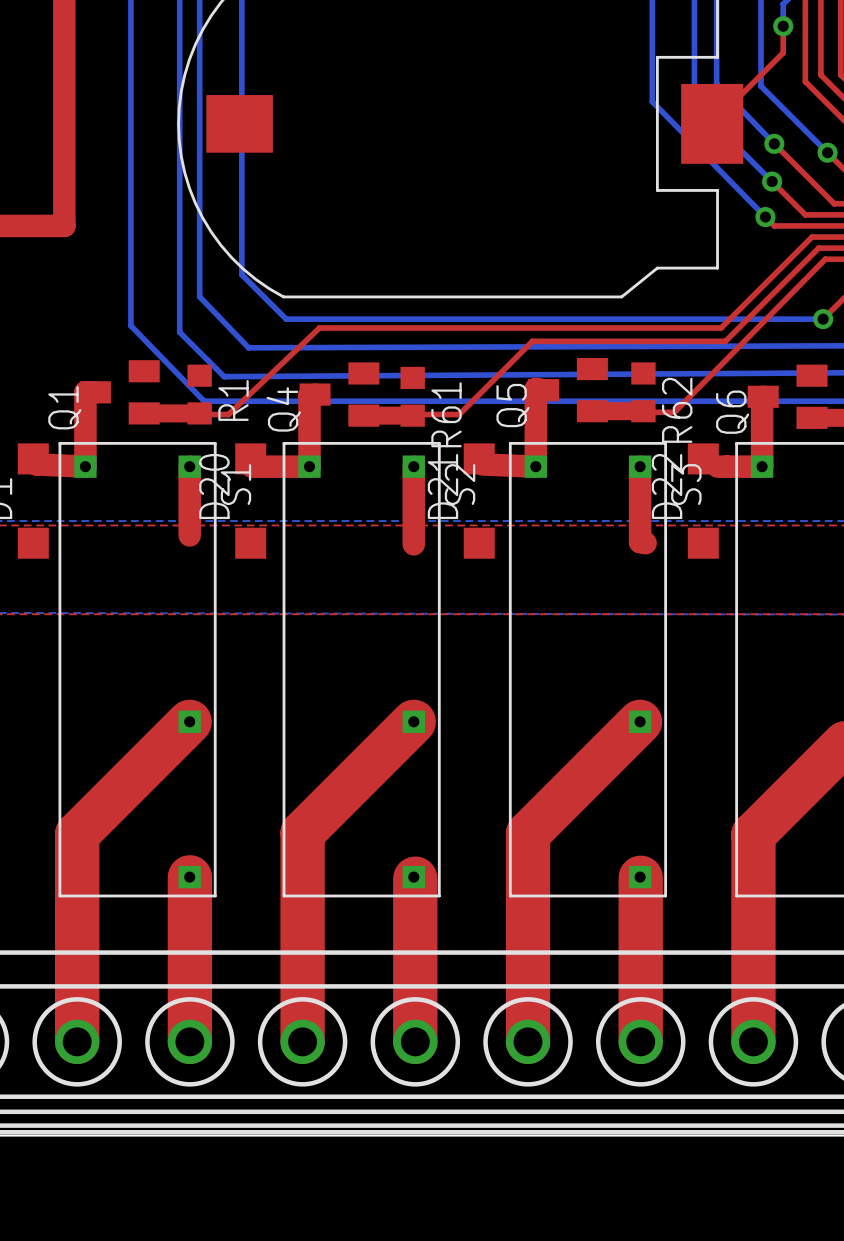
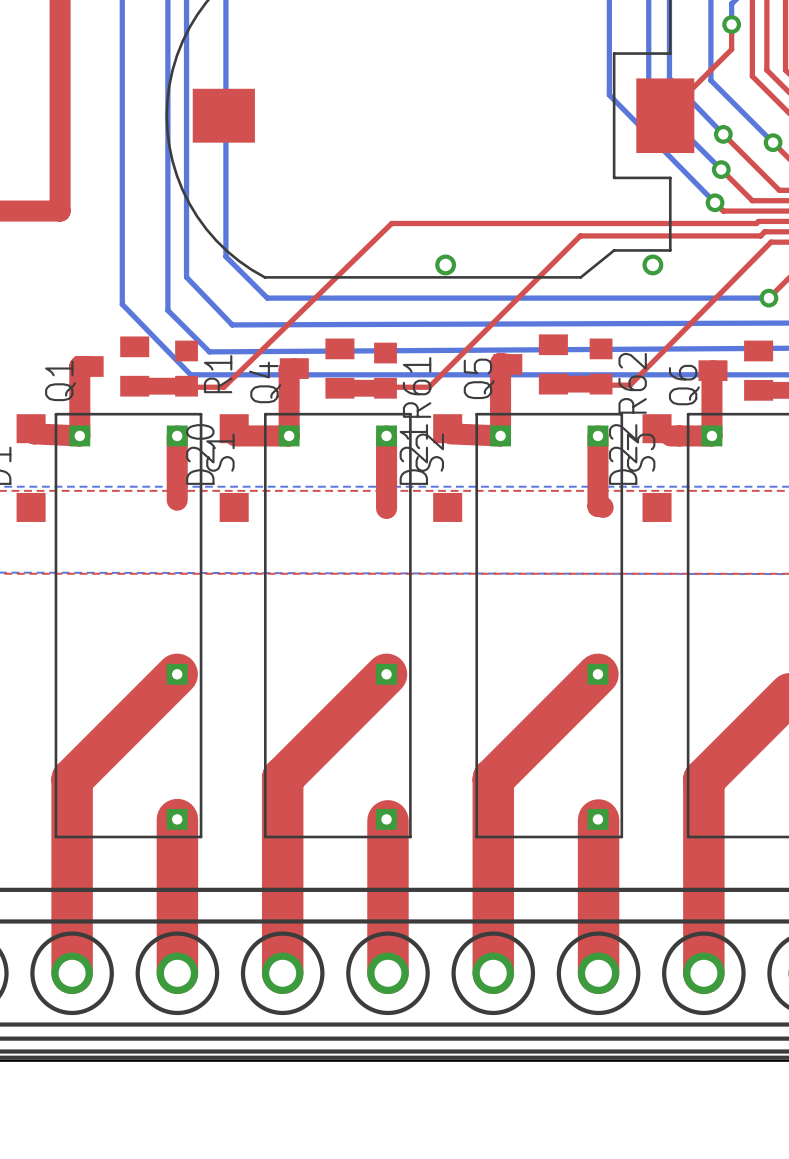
top track: (809, 239) (721, 328) (319, 328) (228, 414) -> (756, 223) (391, 223) (223, 387) (213, 387)
top track: (814, 252) (725, 341) (532, 341) -> (760, 235) (580, 235) (497, 318)
via: none -> (445, 264)
via: none -> (652, 264)

